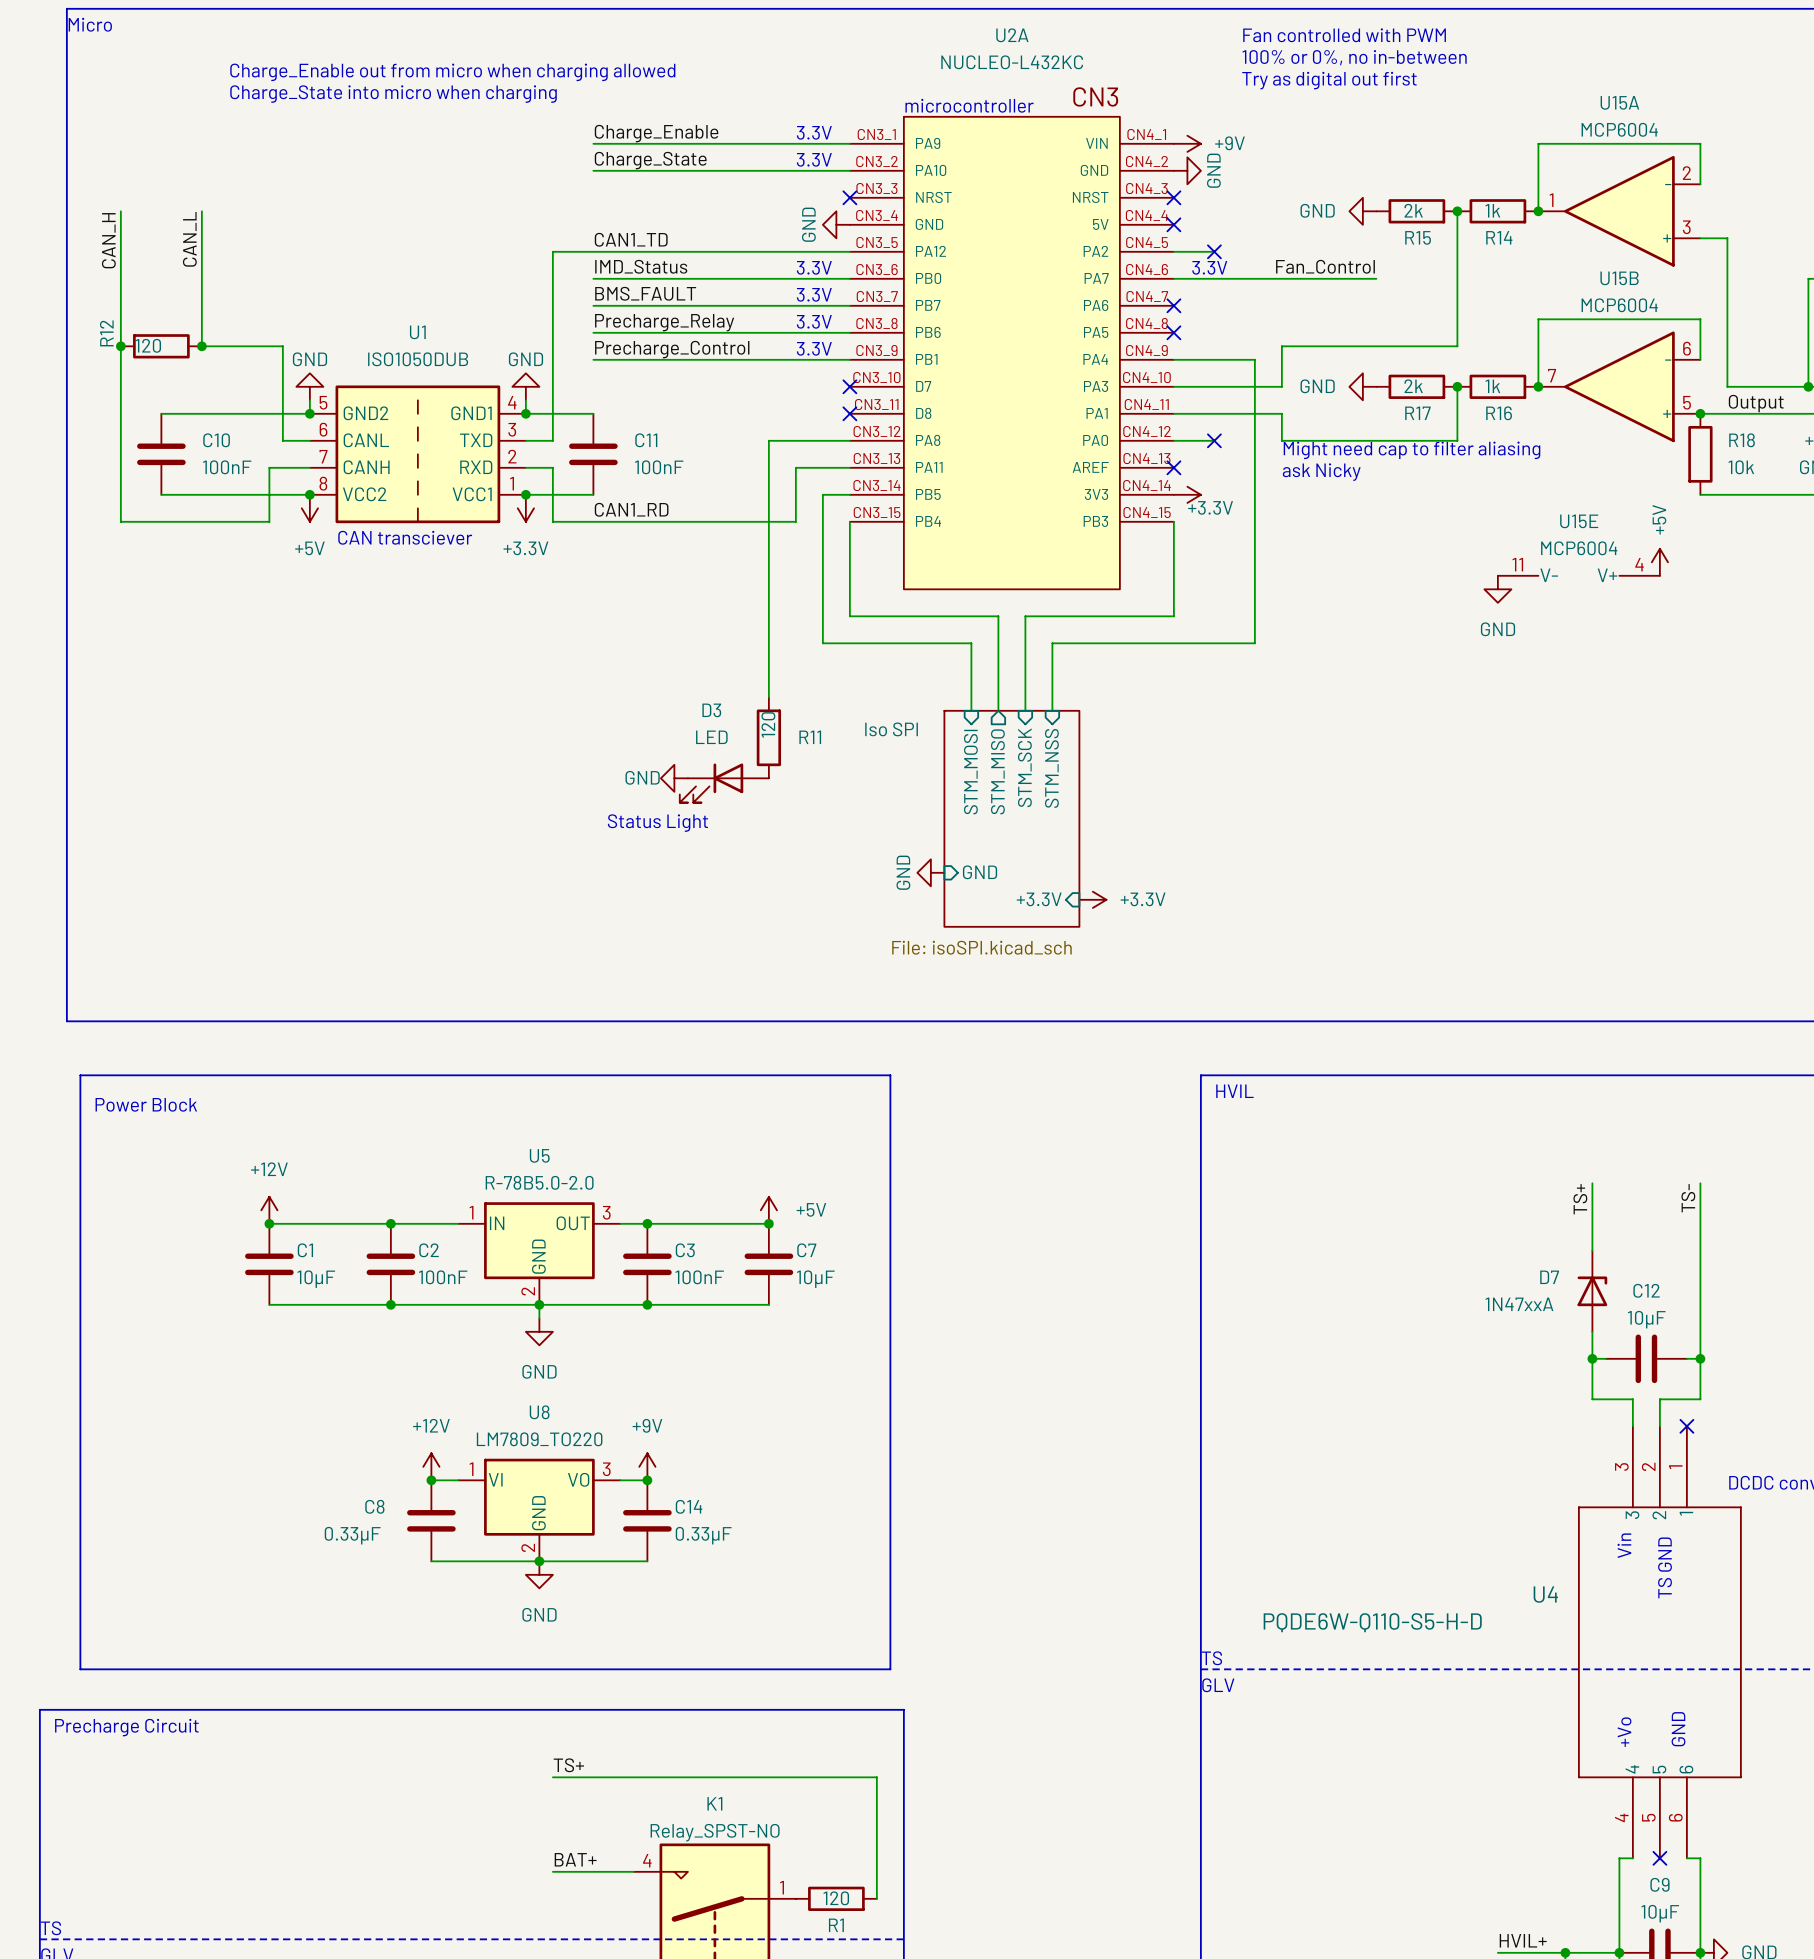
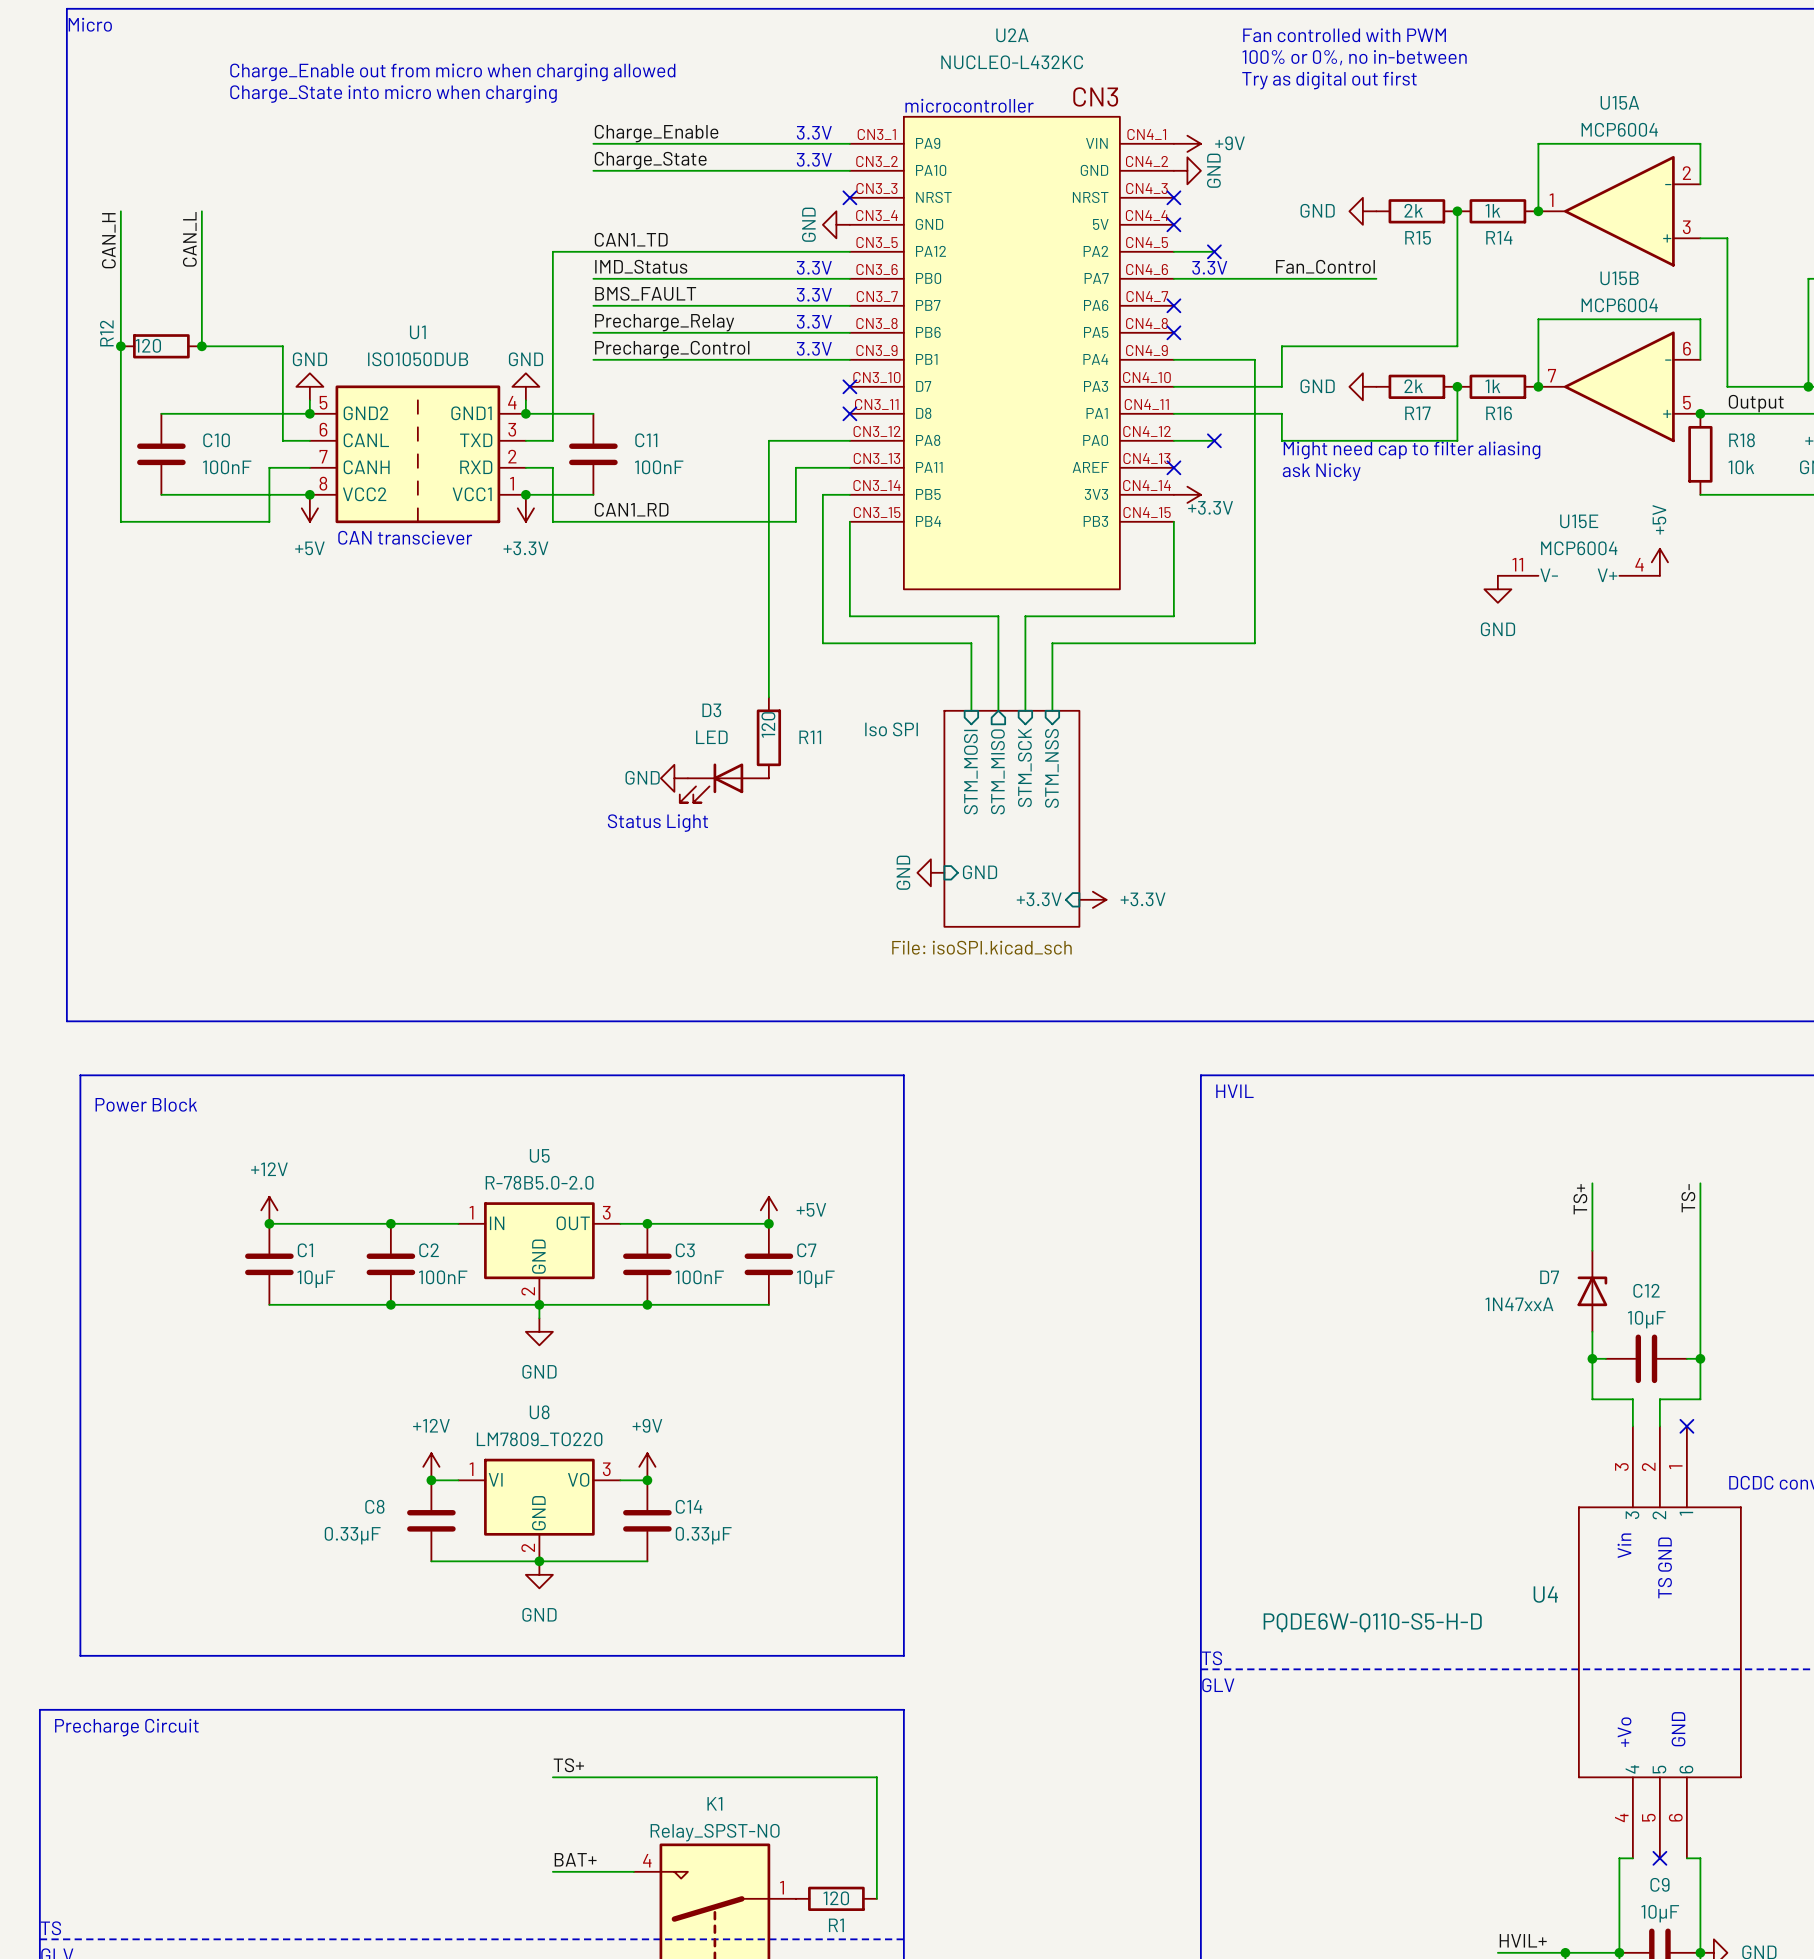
line: (890, 1075) (890, 1669) (80, 1669) (80, 1655) -> (890, 1075) (903, 1075) (903, 1655) (80, 1655)

